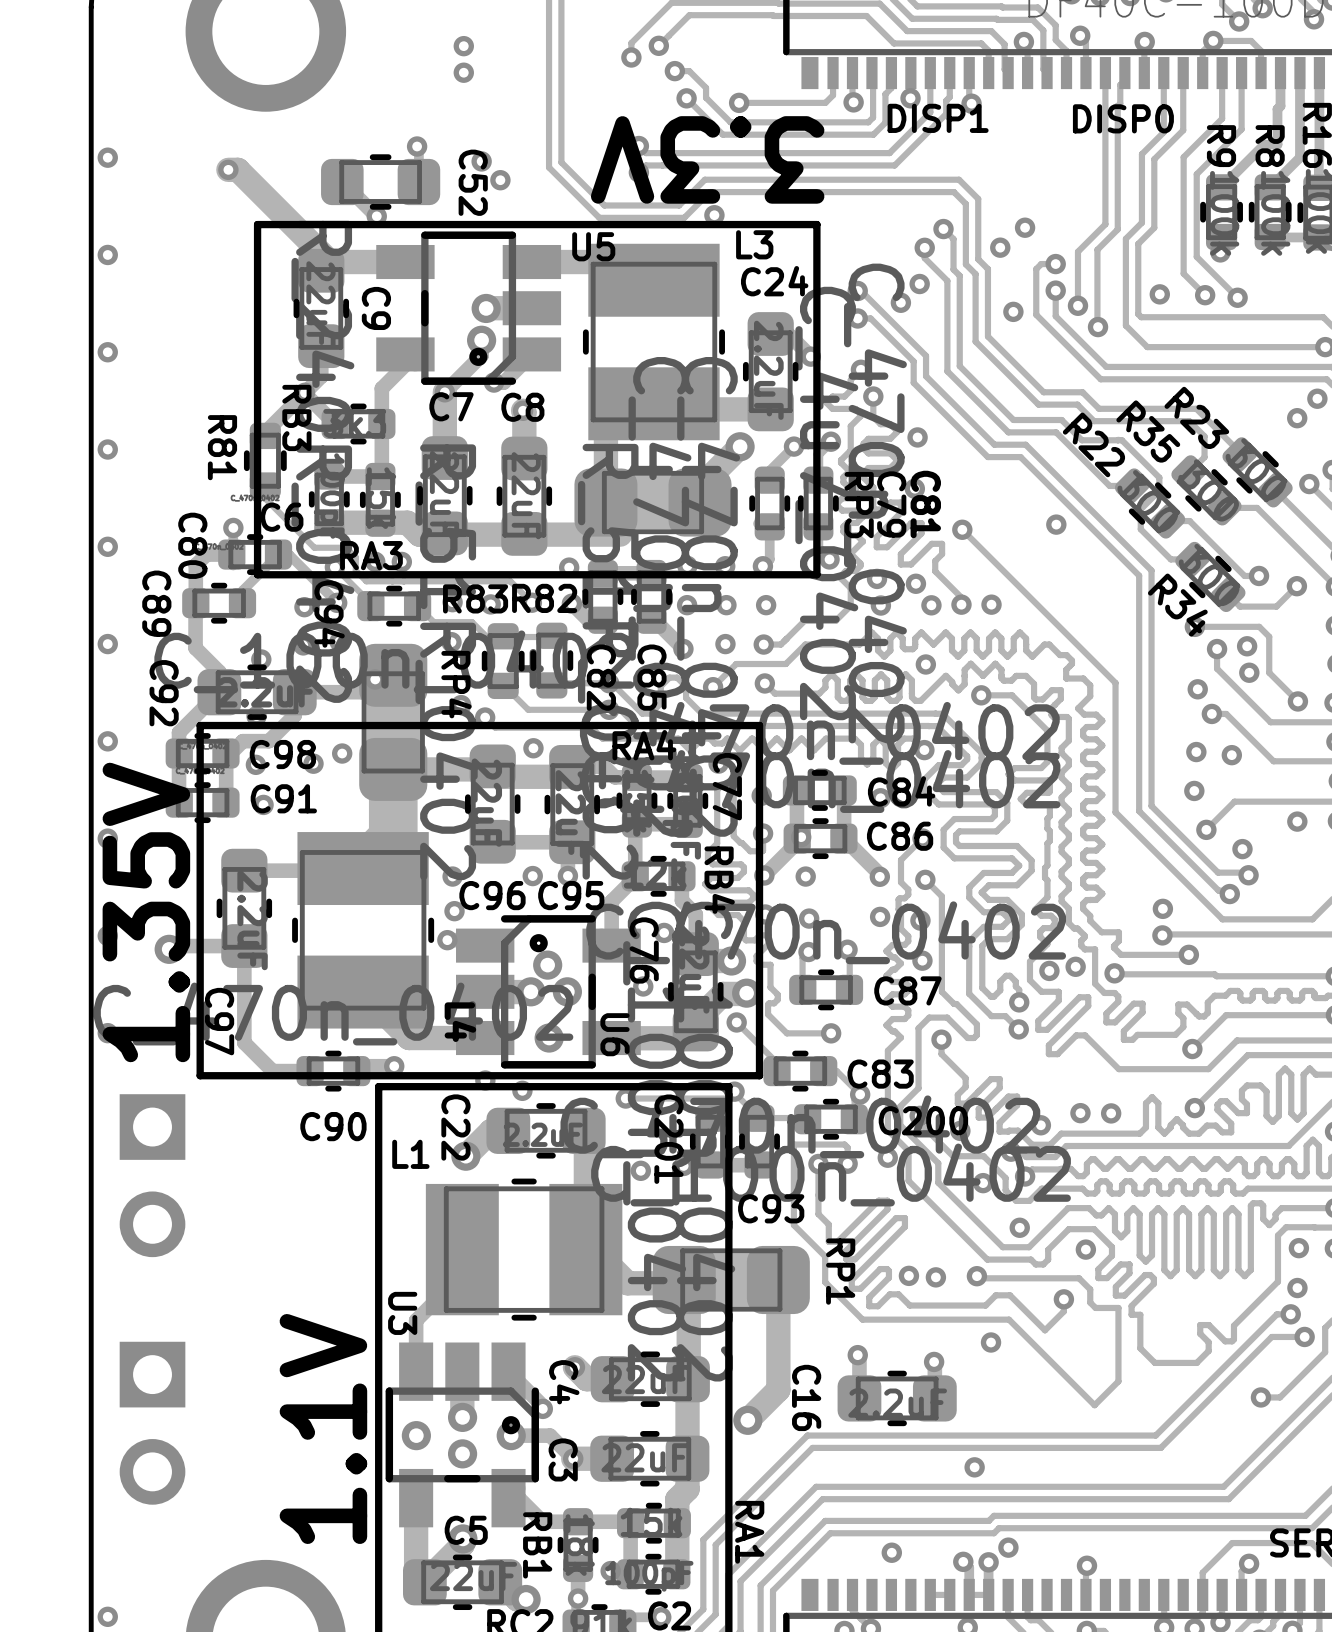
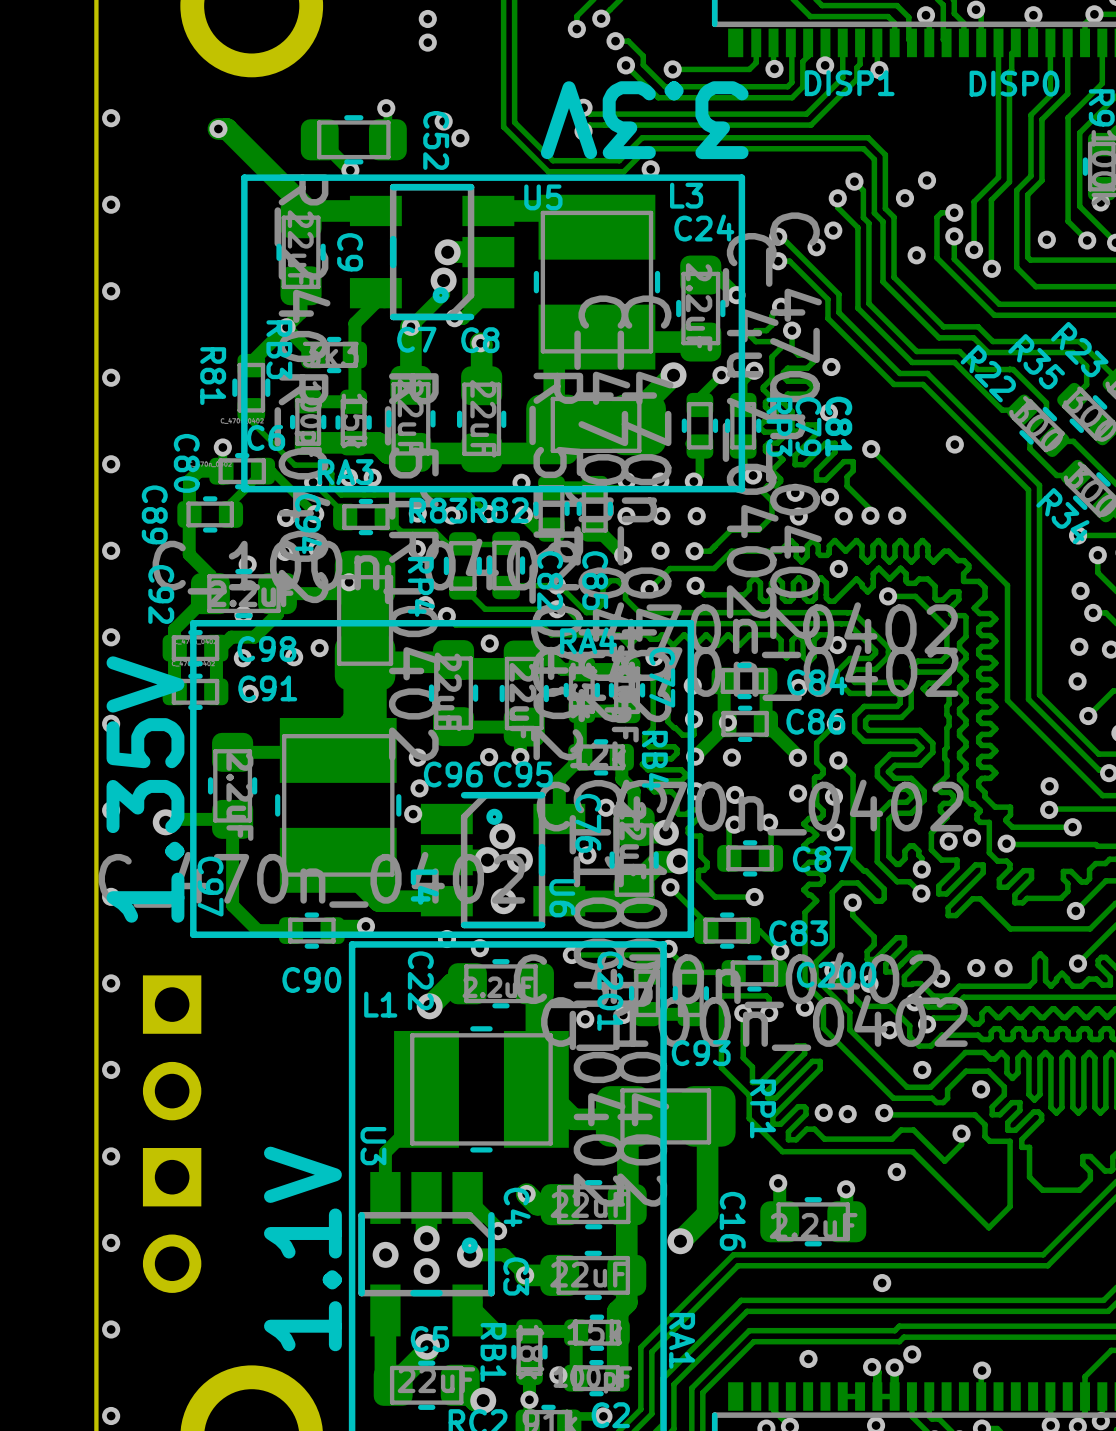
via: none -> (111, 983)
part position: (152, 1175) -> (172, 1047)
via: none -> (111, 1069)
via: none -> (111, 1156)
via: none -> (111, 1242)
part position: (152, 1423) -> (172, 1220)
via: none -> (111, 1329)

